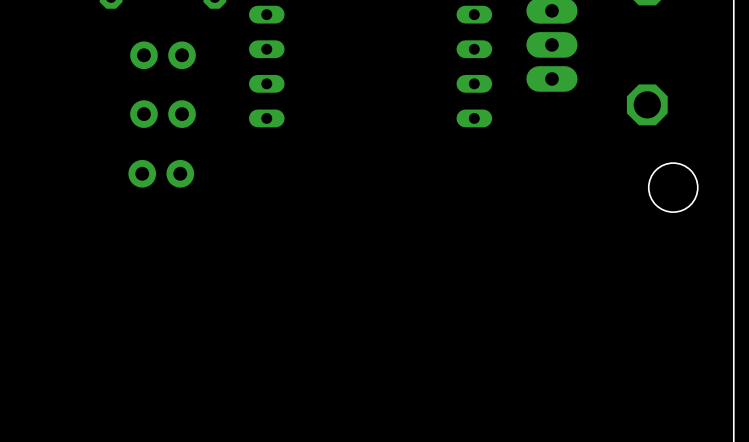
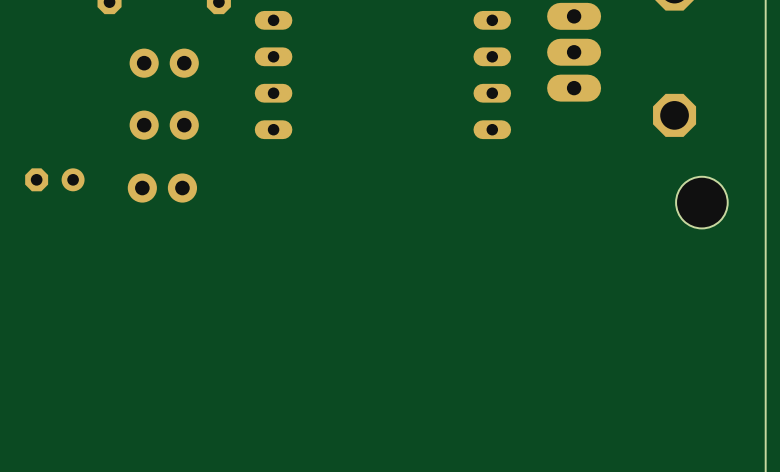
part: none -> (54, 179)

